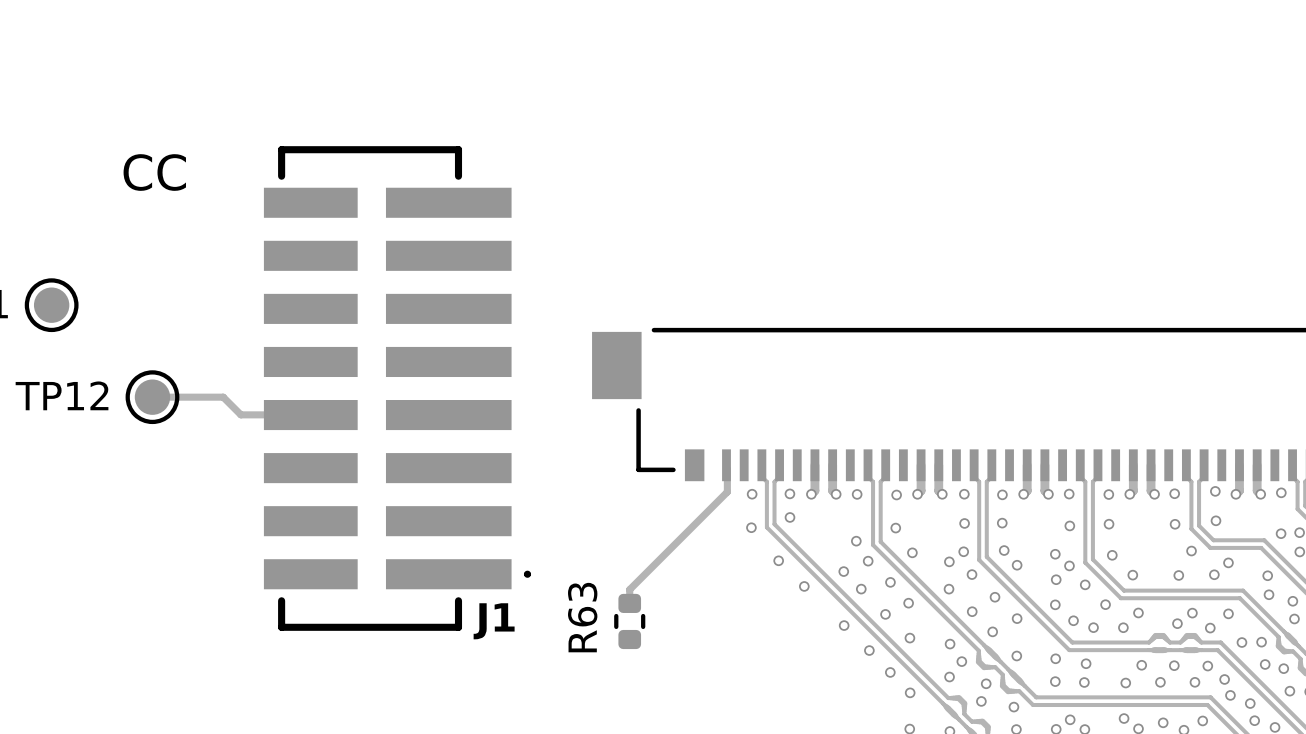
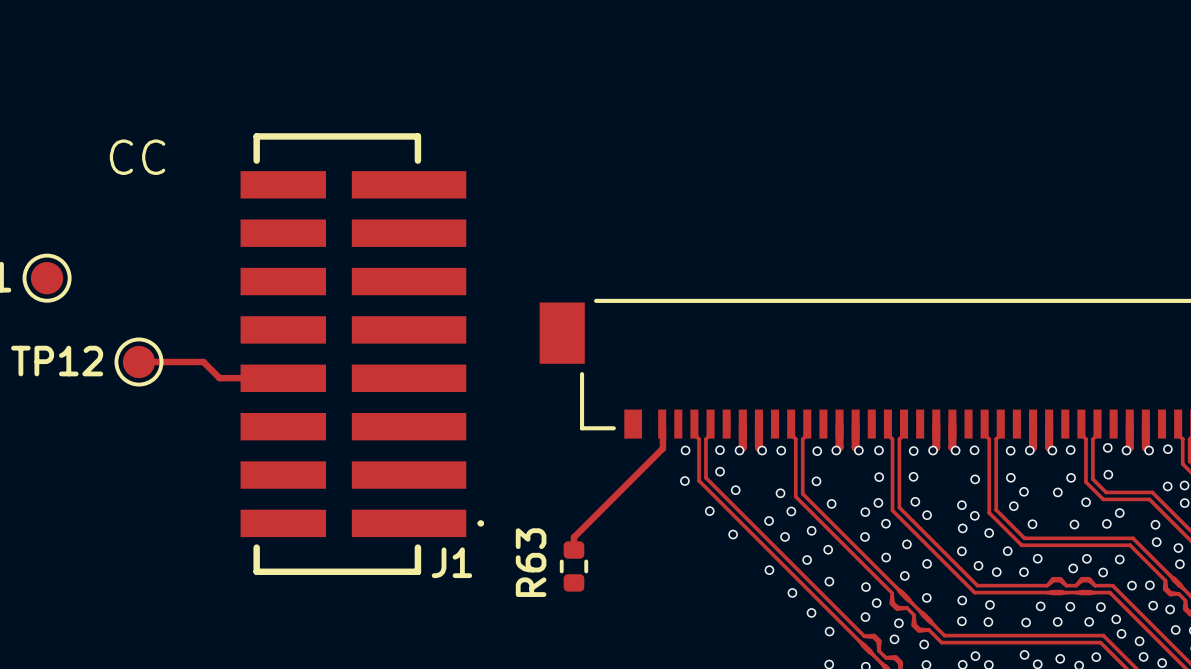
via: none -> (735, 490)
via: none -> (1023, 491)
via: none -> (1057, 492)

